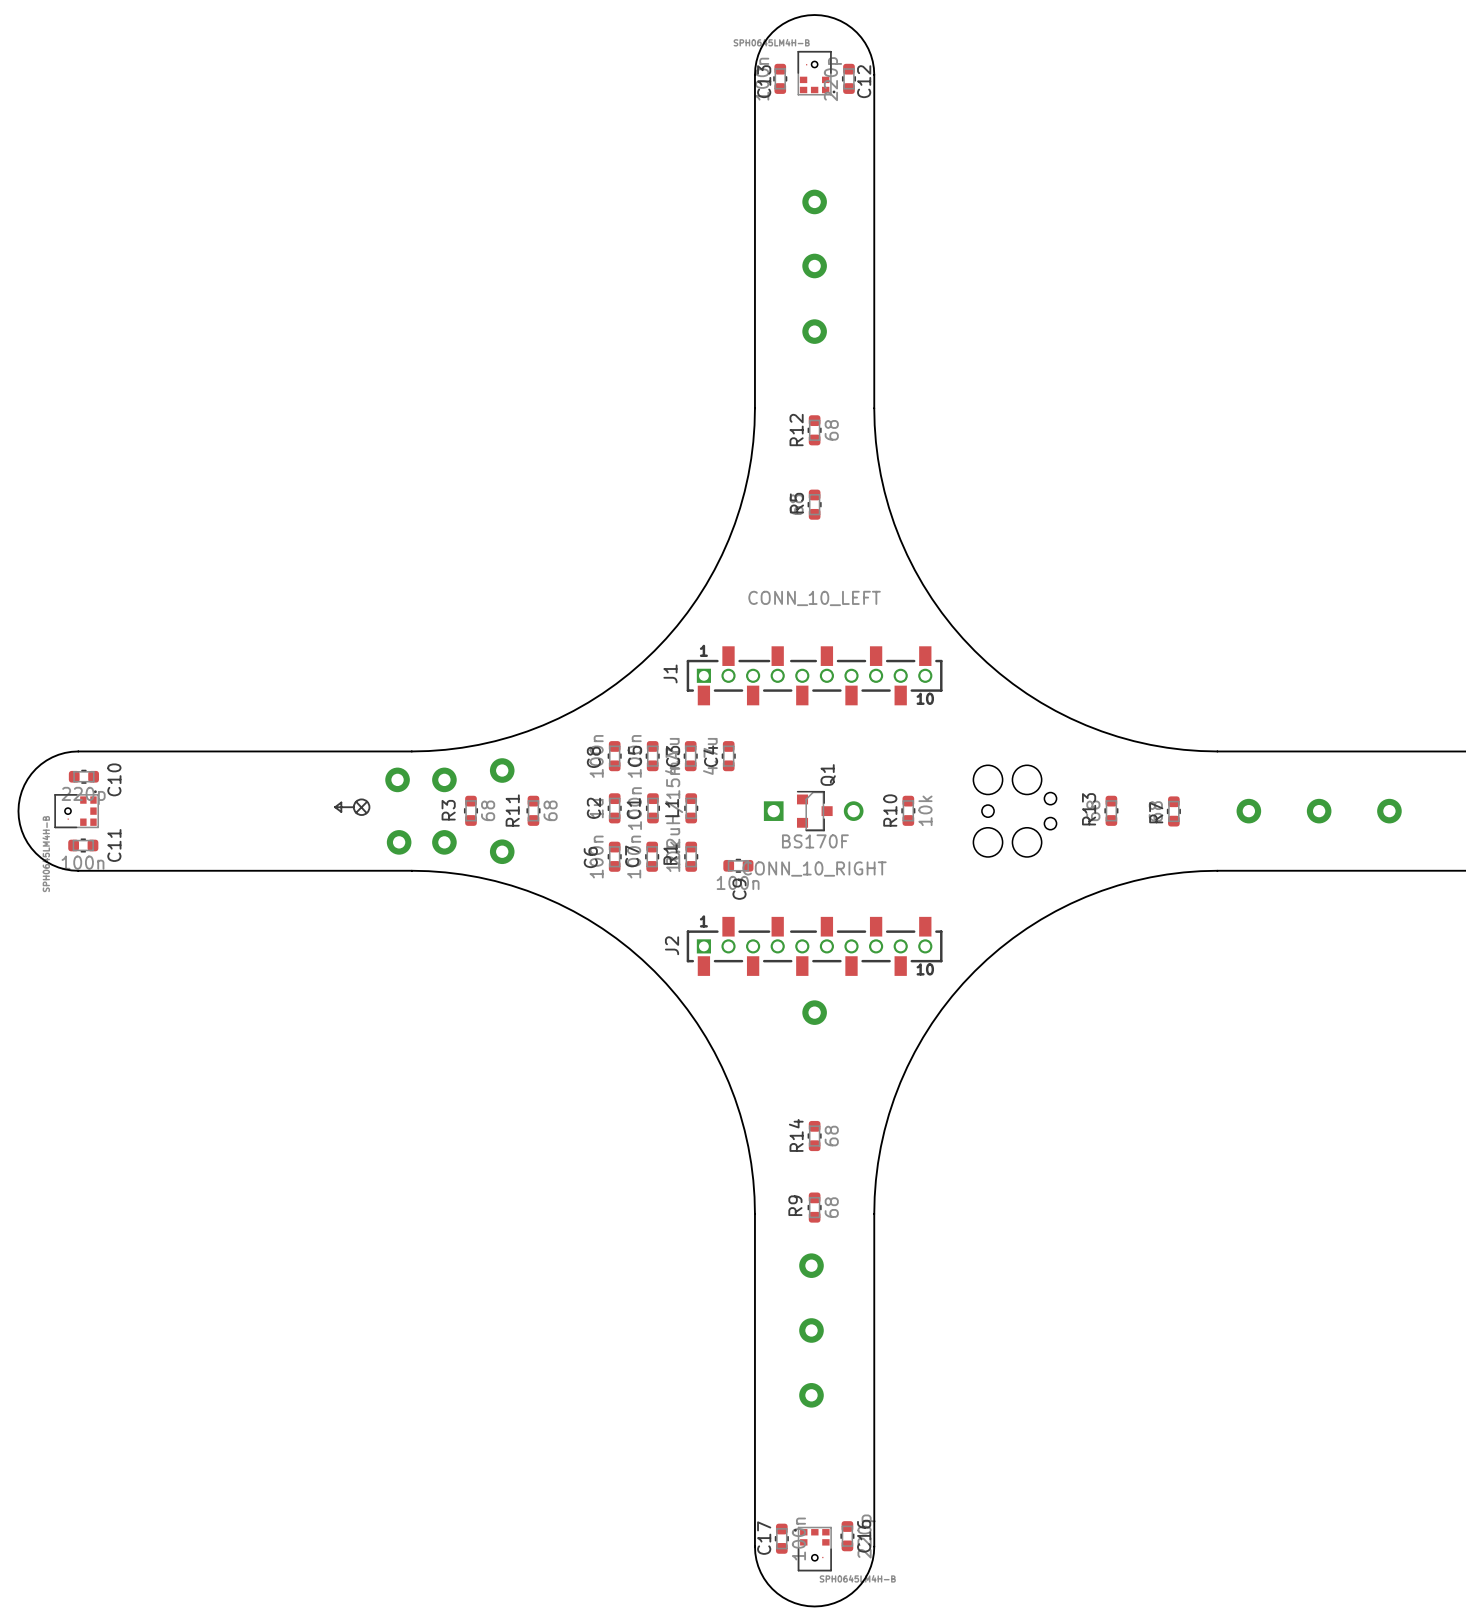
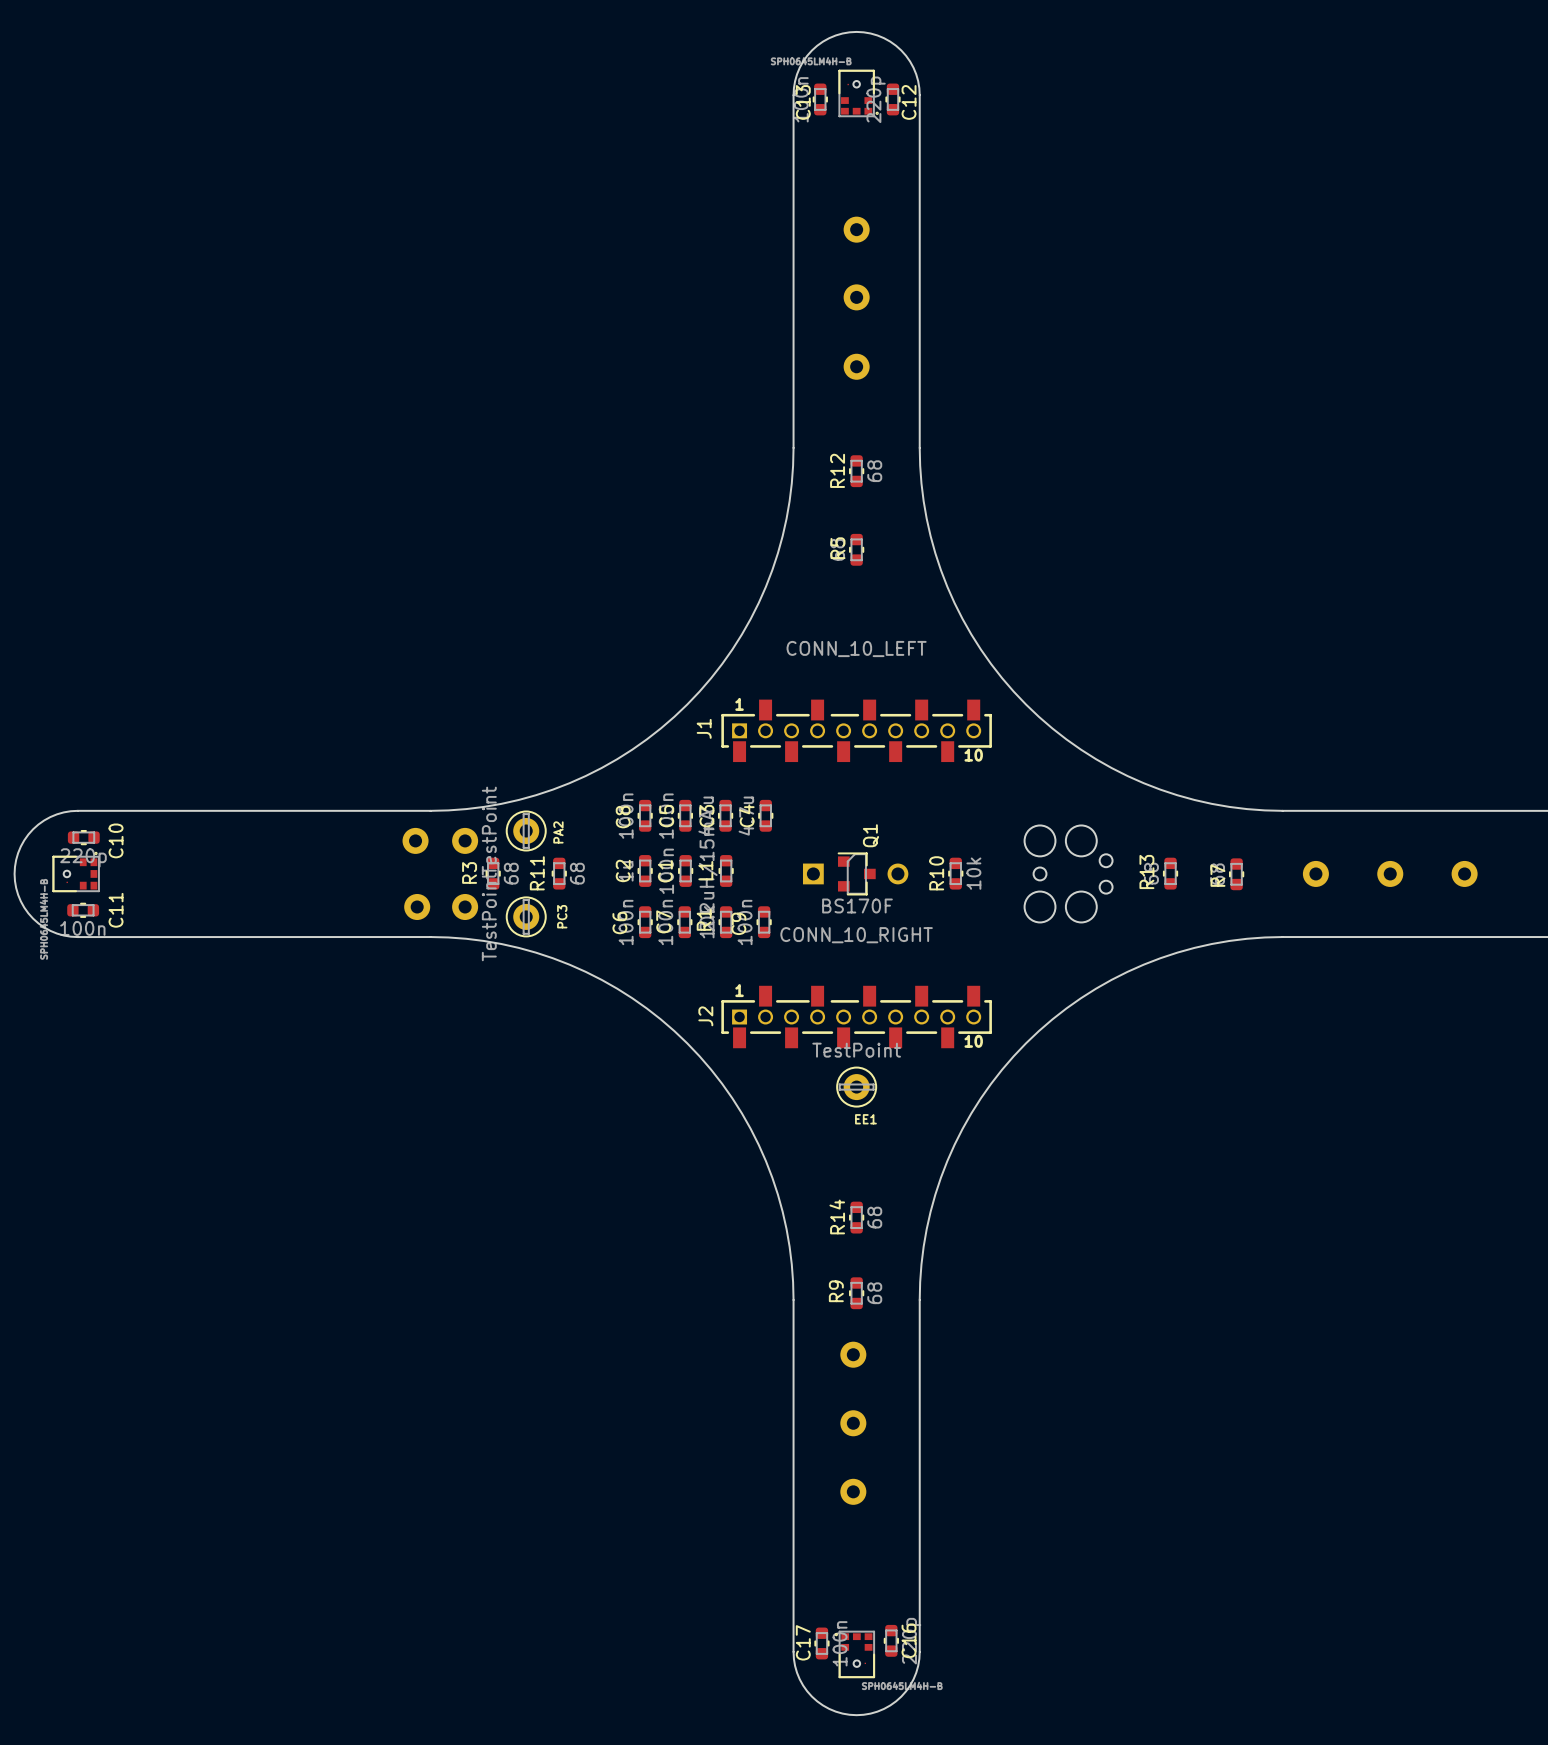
PA2 side: bottom (502, 770) -> top (526, 831)
drawing: [352, 798, 371, 816] -> none
line: (356, 801) (366, 812) -> none
line: (367, 801) (356, 812) -> none
line: (335, 807) (341, 802) (341, 811) (335, 807) -> none
line: (335, 807) (353, 807) -> none
PC3 side: bottom (502, 851) -> top (526, 916)
C9 rotation: 0° (738, 865) -> 90° clockwise (764, 922)
EE1 side: bottom (814, 1012) -> top (856, 1087)

